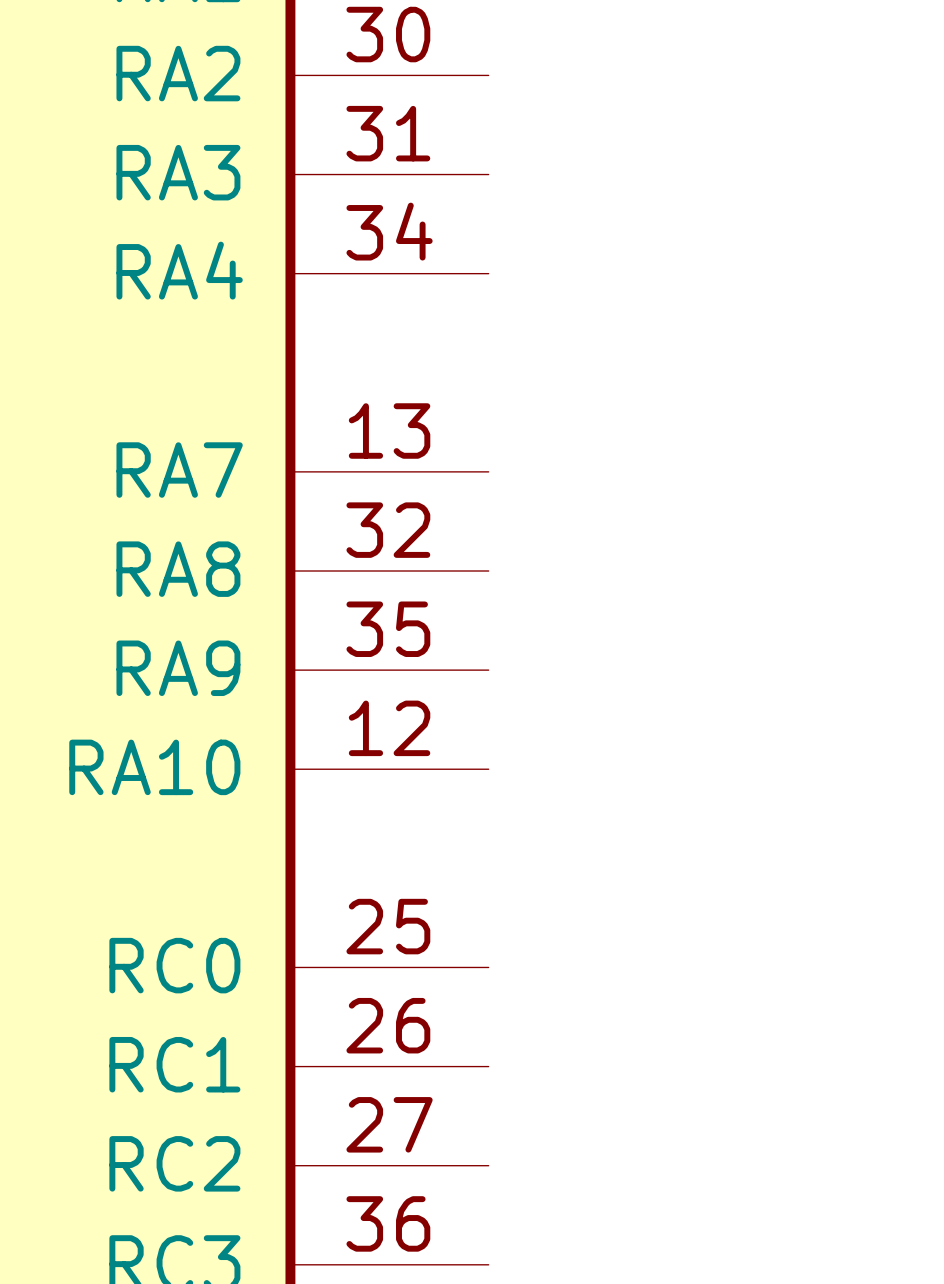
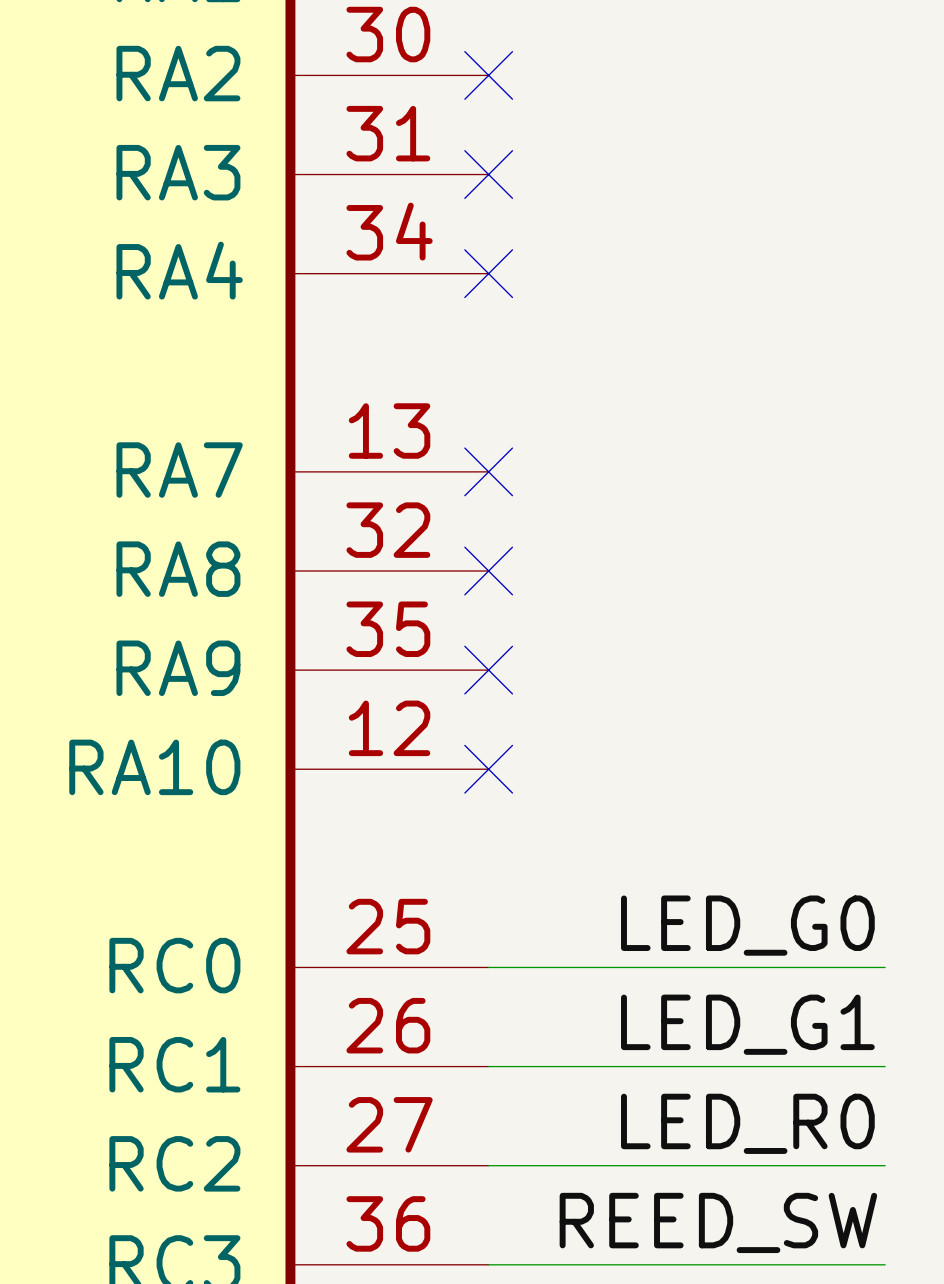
no-connect mark: none -> (488, 75)
no-connect mark: none -> (488, 174)
no-connect mark: none -> (488, 273)
no-connect mark: none -> (488, 471)
no-connect mark: none -> (488, 571)
no-connect mark: none -> (488, 670)
no-connect mark: none -> (488, 769)
label: none -> LED_G0 (747, 925)
wire: none -> (488, 967) (885, 967)
label: none -> LED_G1 (747, 1024)
wire: none -> (488, 1066) (885, 1066)
label: none -> LED_R0 (747, 1123)
wire: none -> (488, 1165) (885, 1165)
label: none -> REED_SW (718, 1222)
wire: none -> (488, 1264) (885, 1264)

